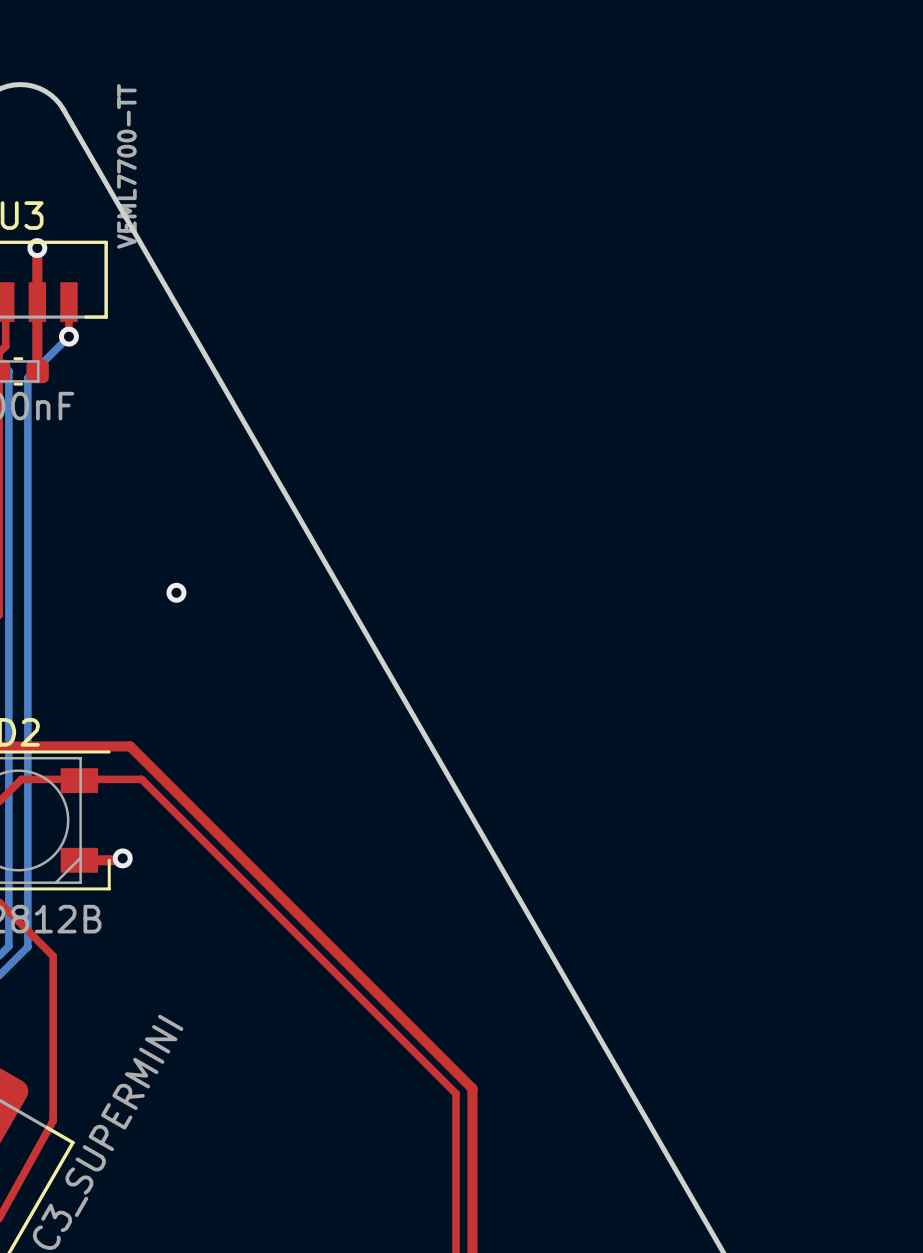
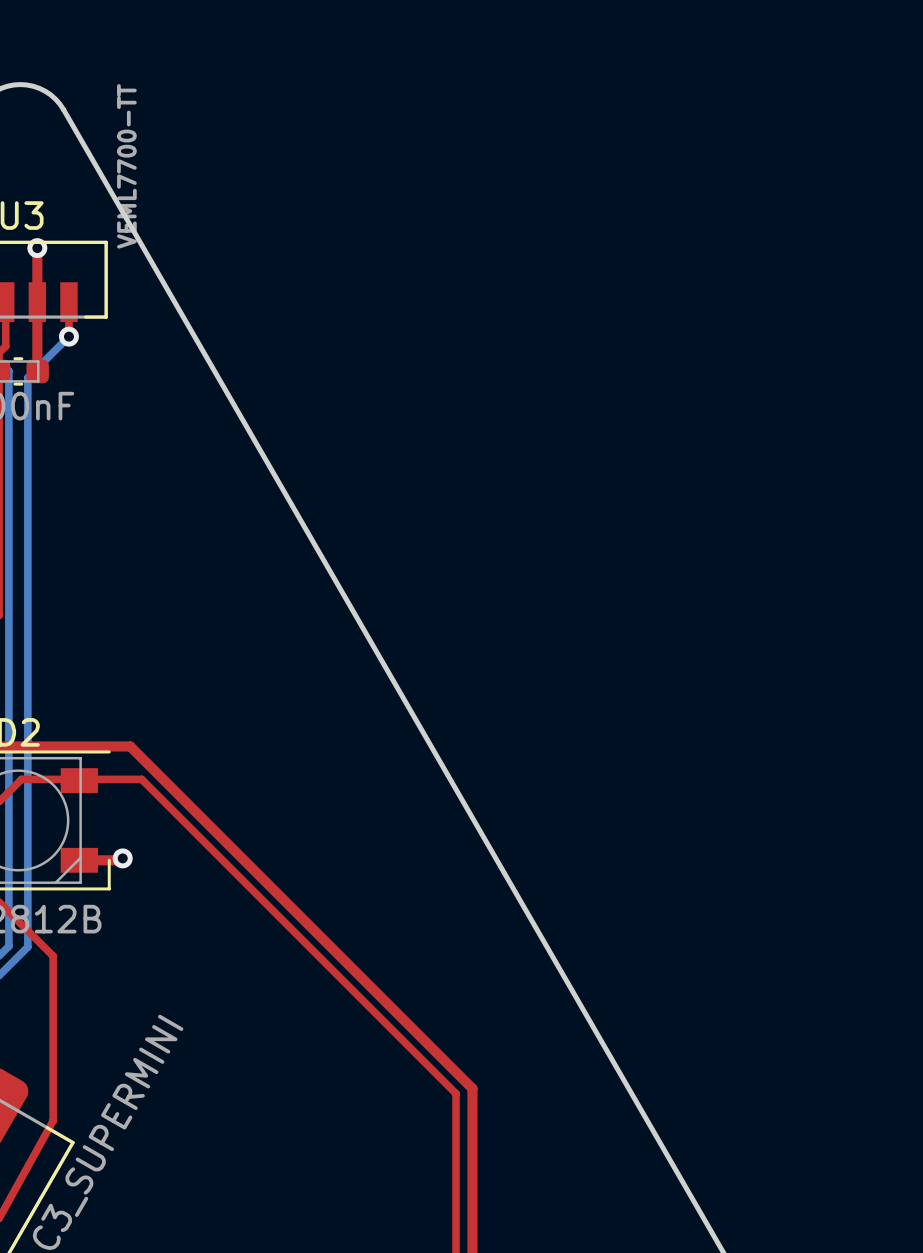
via: (176, 592) -> none

